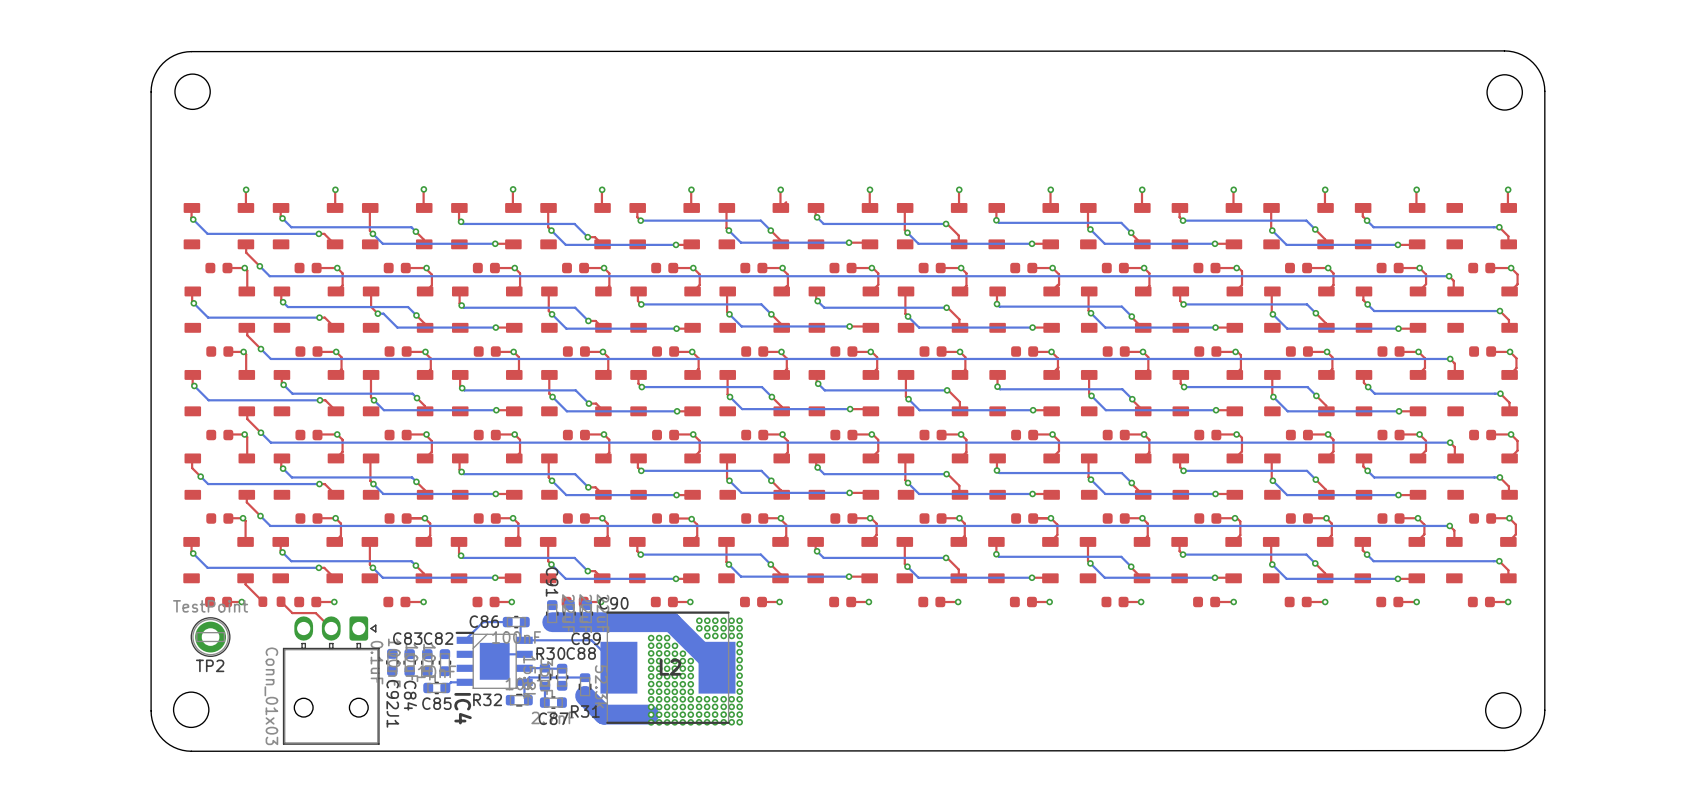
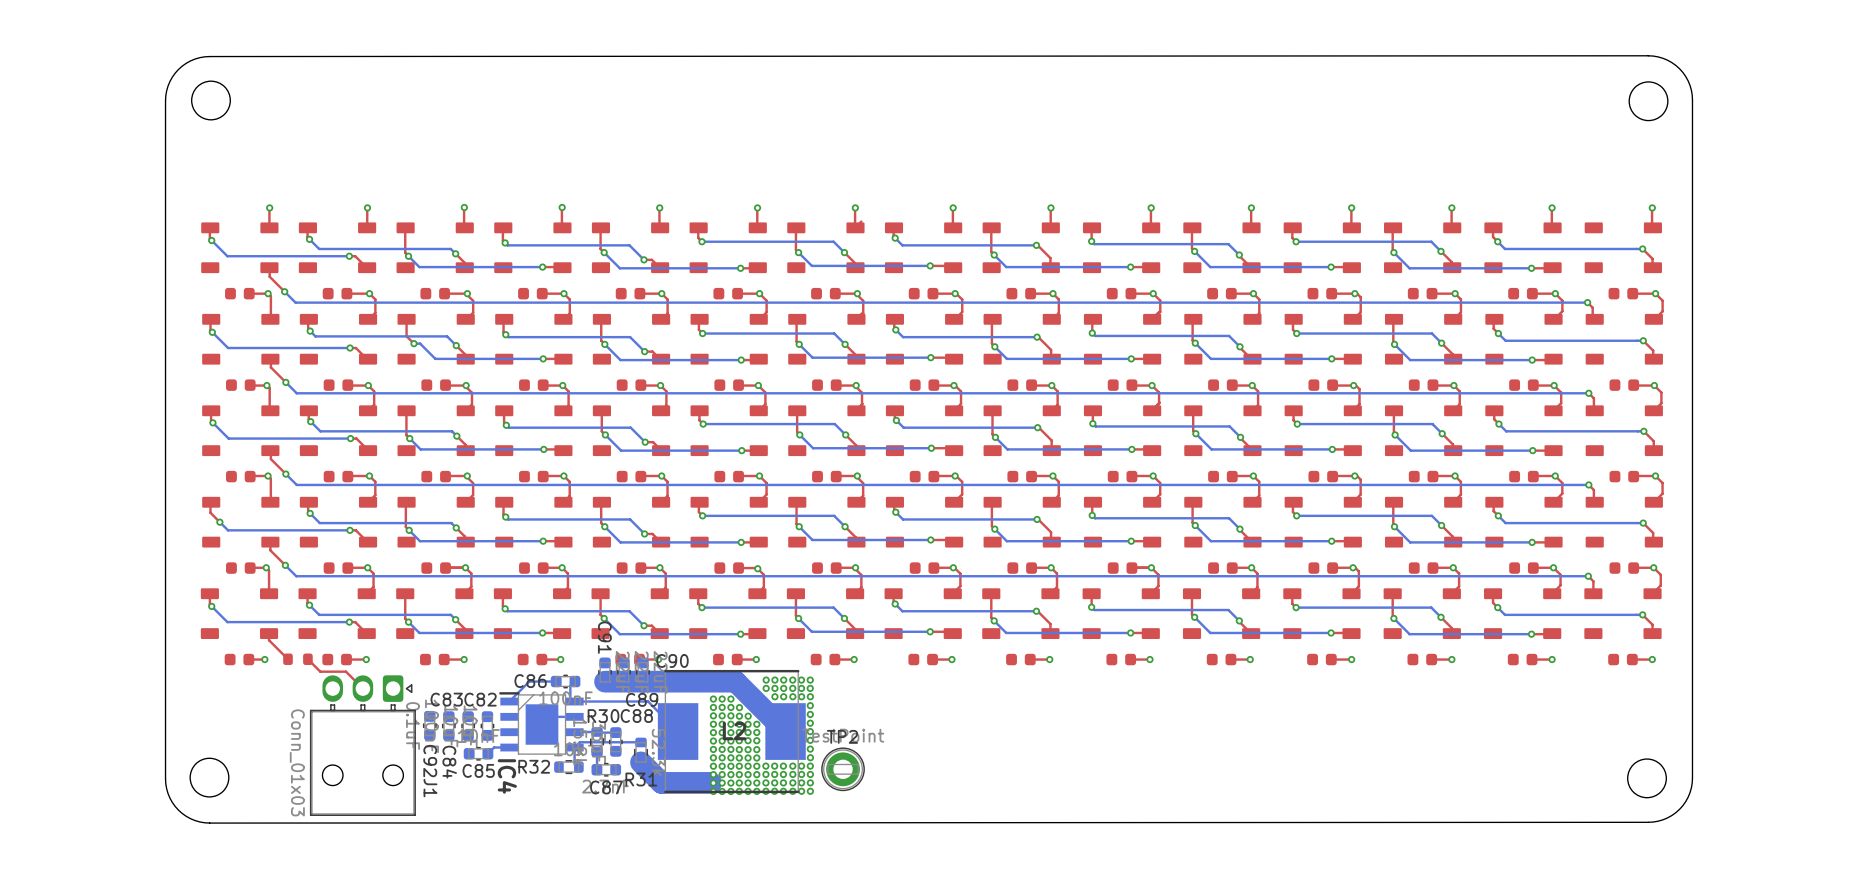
TP2 position: (210, 637) -> (843, 769)
TP2 name position: TP2 (210, 665) -> TP2 (842, 736)

